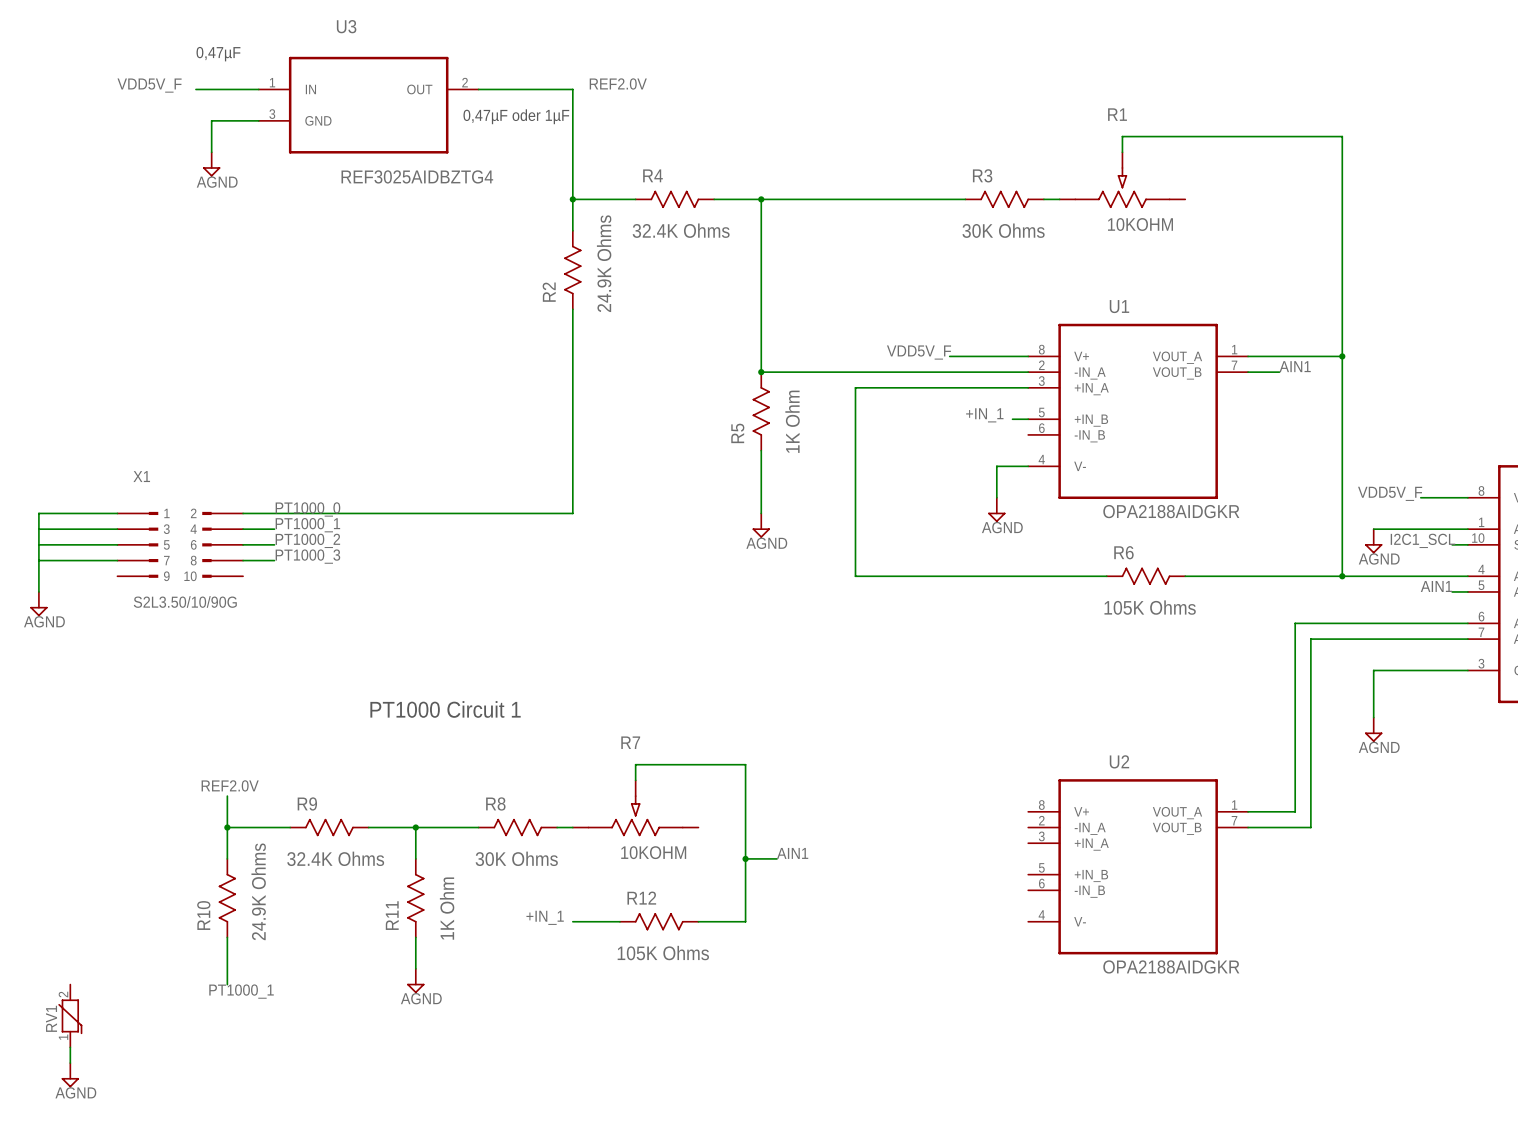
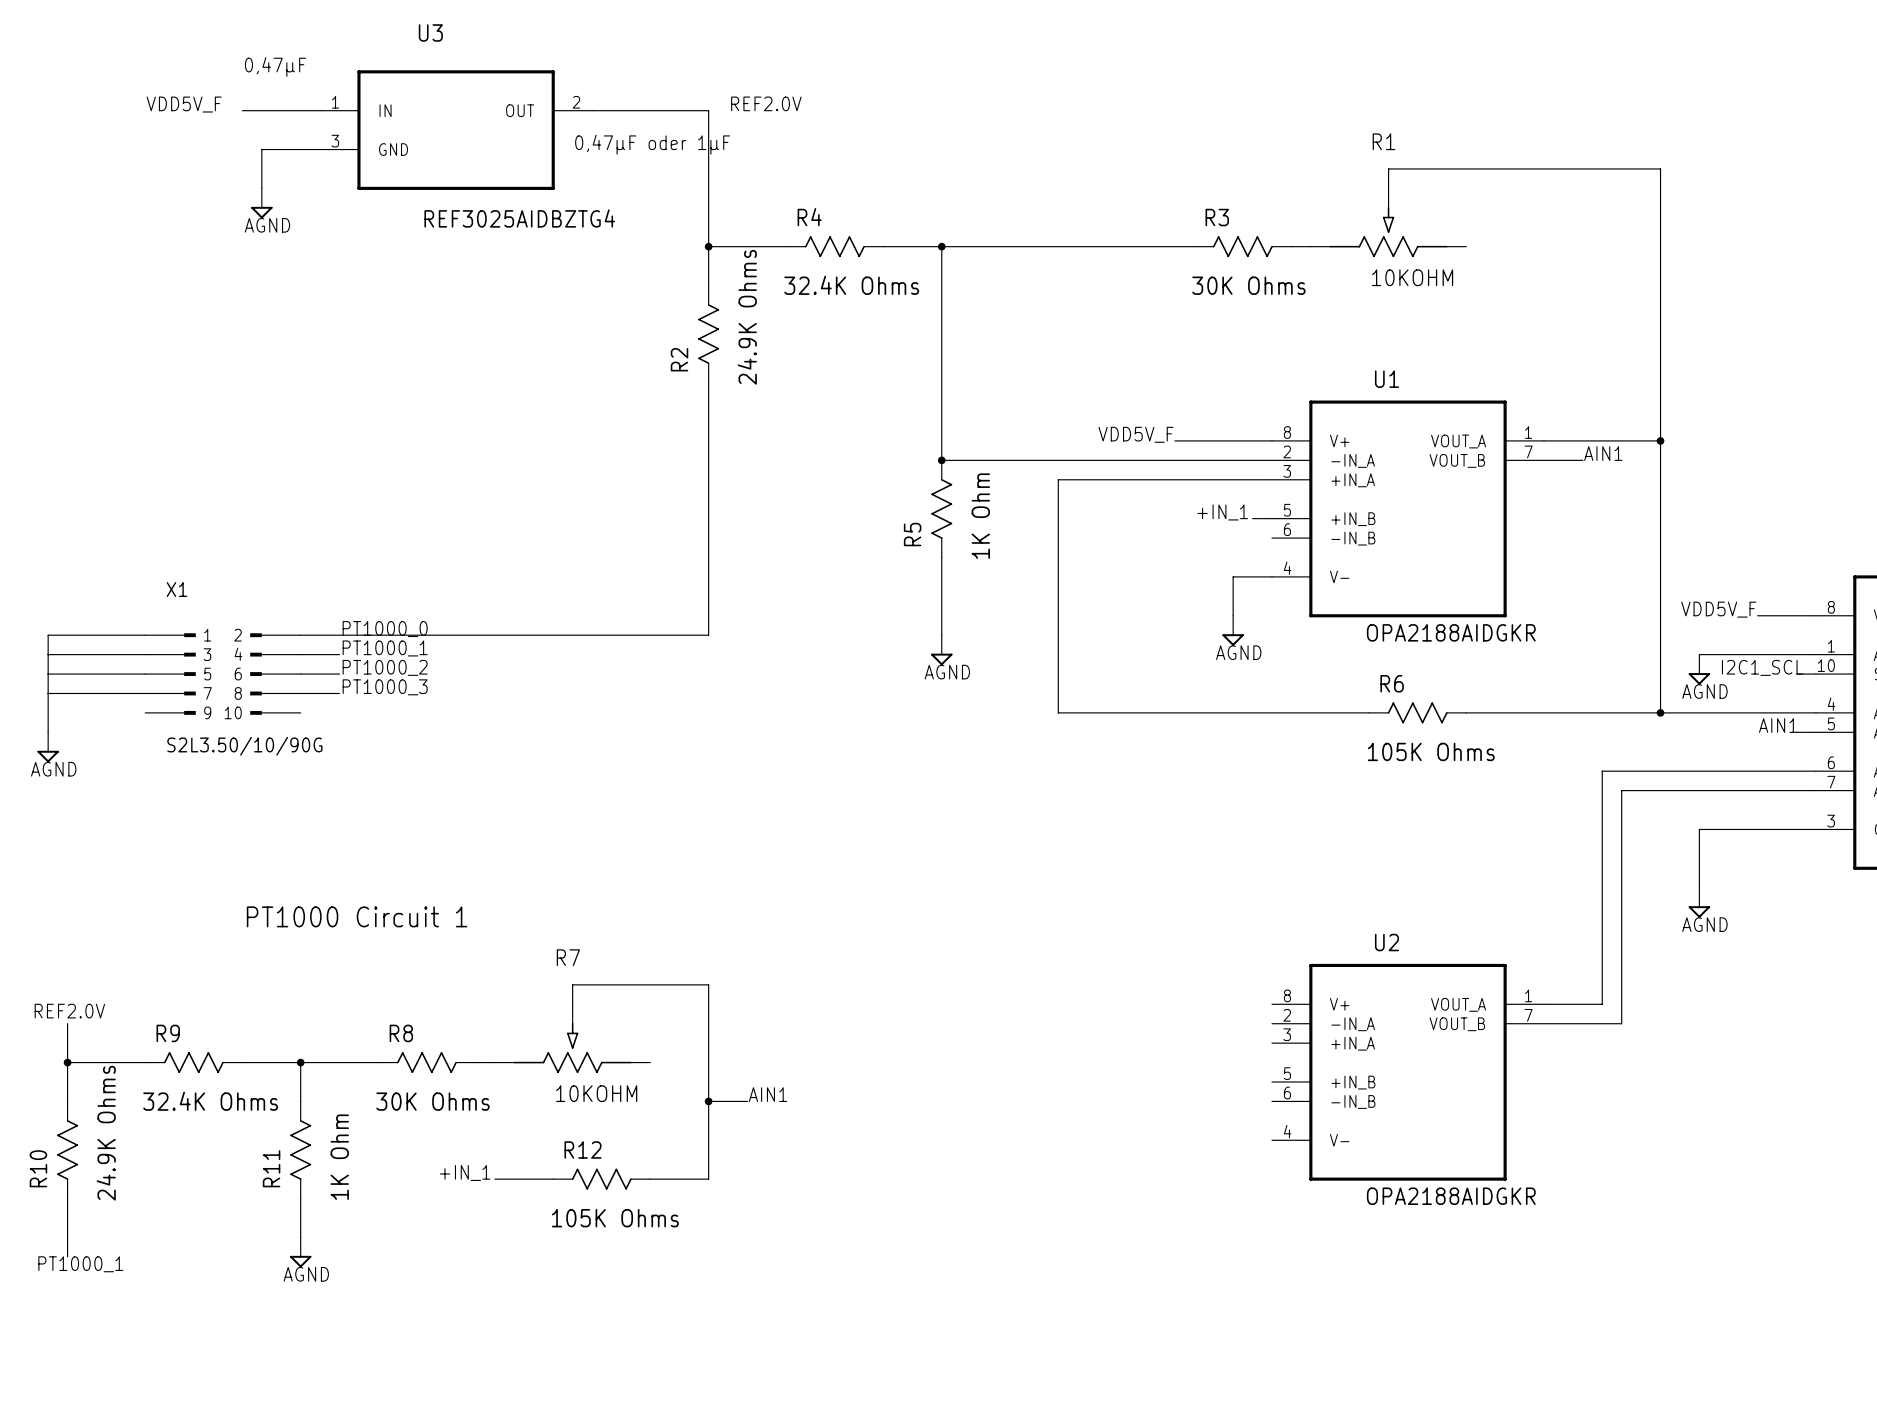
text: PT1000 Circuit 1 (445, 709) -> none
text: none -> PT1000 Circuit 1 (357, 916)
wire: (635, 780) (635, 764) (745, 764) (745, 921) (698, 921) -> none
label: REF2.0V (230, 785) -> none
wire: (227, 796) (227, 858) -> none
R7 position: (635, 808) -> (572, 1038)
wire: none -> (572, 1004) (572, 984) (708, 984) (708, 1179) (650, 1179)
label: none -> REF2.0V (69, 1011)
wire: none -> (67, 1023) (67, 1101)
wire: (227, 827) (290, 827) -> none
junction position: (227, 827) -> (300, 1062)
R9 position: (329, 827) -> (193, 1062)
wire: (368, 827) (478, 827) -> none
wire: (415, 827) (415, 858) -> none
junction: (415, 827) -> none
R8 position: (517, 827) -> (426, 1062)
wire: (557, 827) (572, 827) -> none
label: AIN1 (792, 853) -> none
wire: none -> (67, 1062) (145, 1062)
junction: none -> (67, 1062)
wire: none -> (242, 1062) (378, 1062)
wire: none -> (300, 1062) (300, 1101)
wire: none -> (475, 1062) (494, 1062)
wire: (745, 858) (776, 858) -> none
junction: (745, 858) -> none
label: none -> AIN1 (768, 1094)
wire: none -> (708, 1101) (747, 1101)
junction: none -> (708, 1101)
R10 position: (227, 898) -> (67, 1149)
R11 position: (415, 898) -> (300, 1149)
label: +IN_1 (545, 917) -> none
wire: (572, 921) (619, 921) -> none
R12 position: (659, 921) -> (601, 1179)
wire: (227, 937) (227, 984) -> none
wire: (415, 937) (415, 968) -> none
label: none -> +IN_1 (465, 1172)
wire: none -> (494, 1179) (553, 1179)
wire: none -> (67, 1198) (67, 1256)
wire: none -> (300, 1198) (300, 1237)
power symbol: AGND (415, 981) -> none
label: PT1000_1 (241, 991) -> none
power symbol: none -> AGND (300, 1252)
RV1: (70, 1015) -> none
label: none -> PT1000_1 (80, 1264)
wire: (70, 1047) (70, 1063) -> none
power symbol: AGND (70, 1075) -> none

